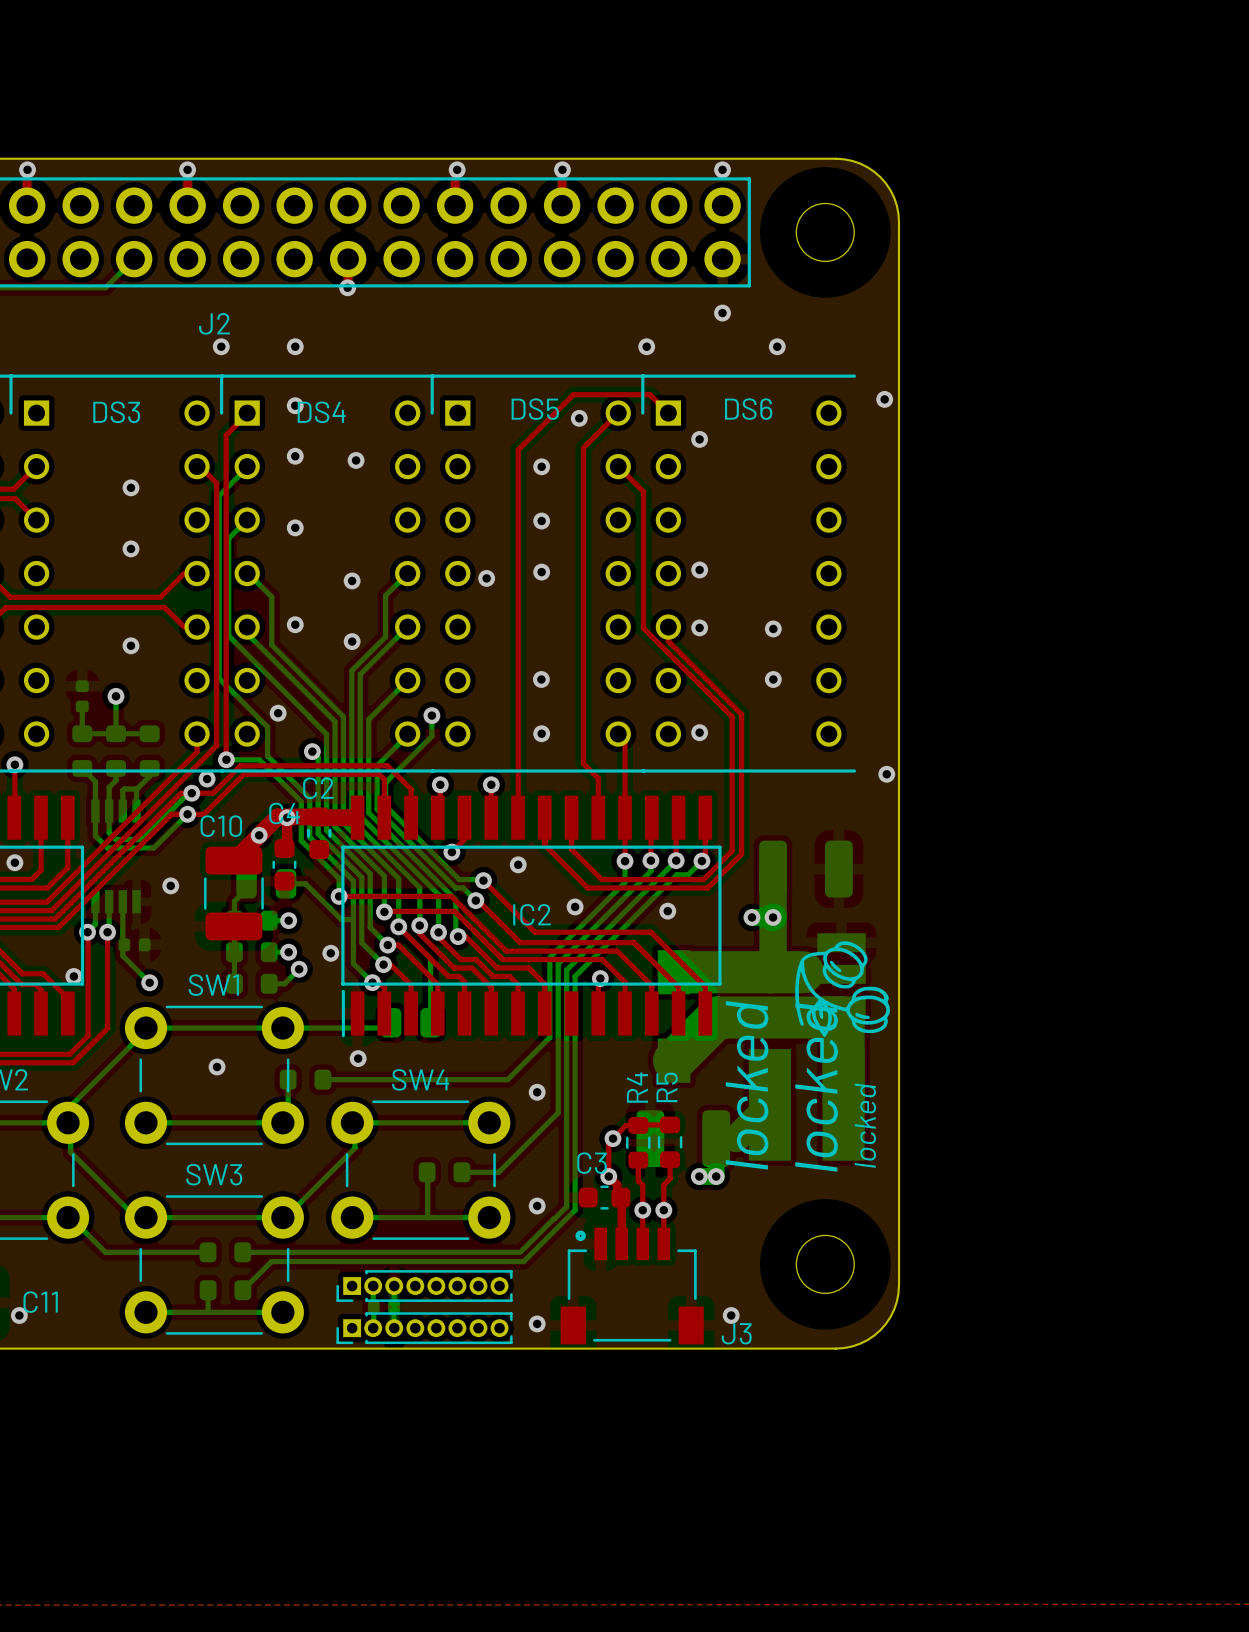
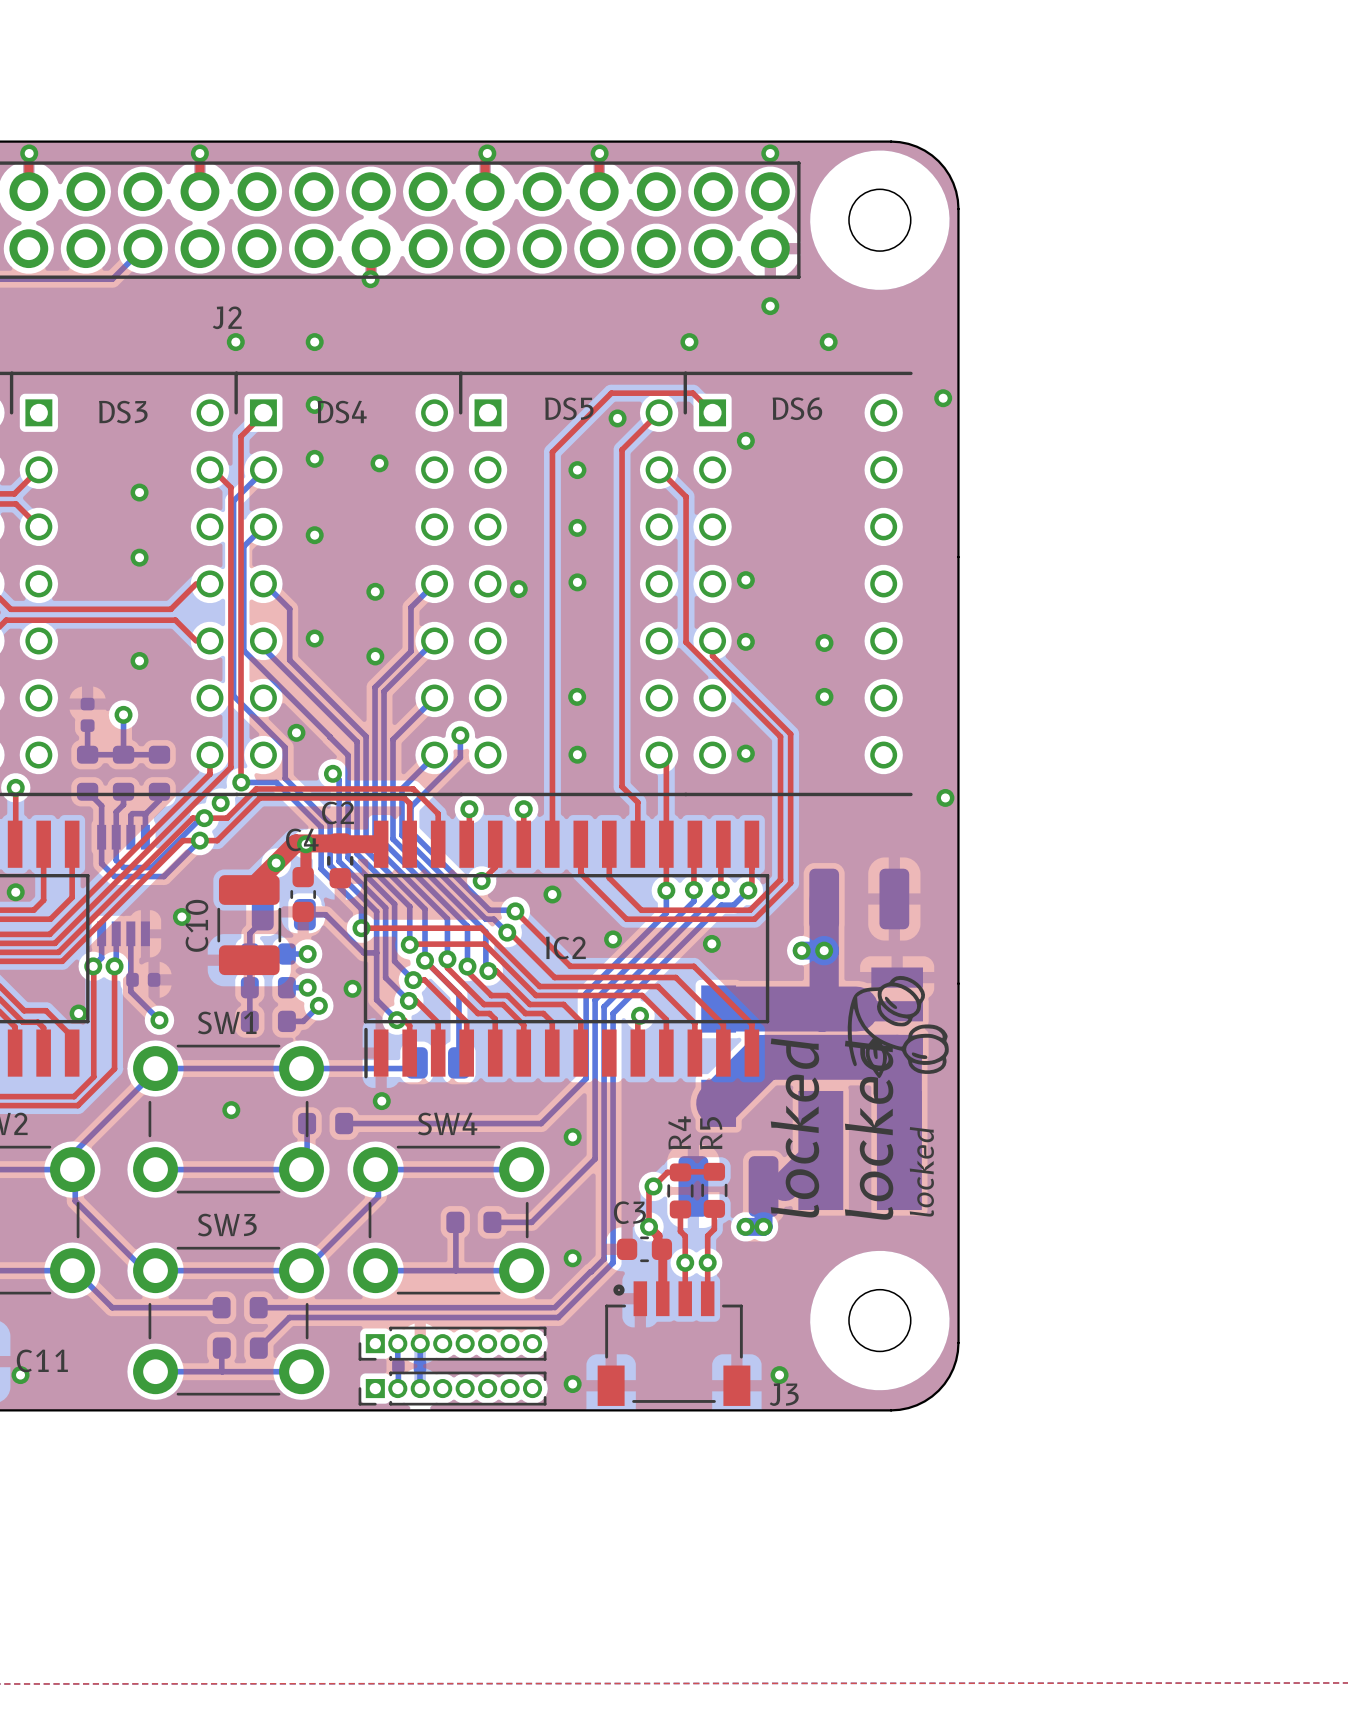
C10 name rotation: 0° (221, 826) -> 90° counterclockwise (196, 925)
C10 name position: C10 (221, 826) -> C10 (196, 925)

